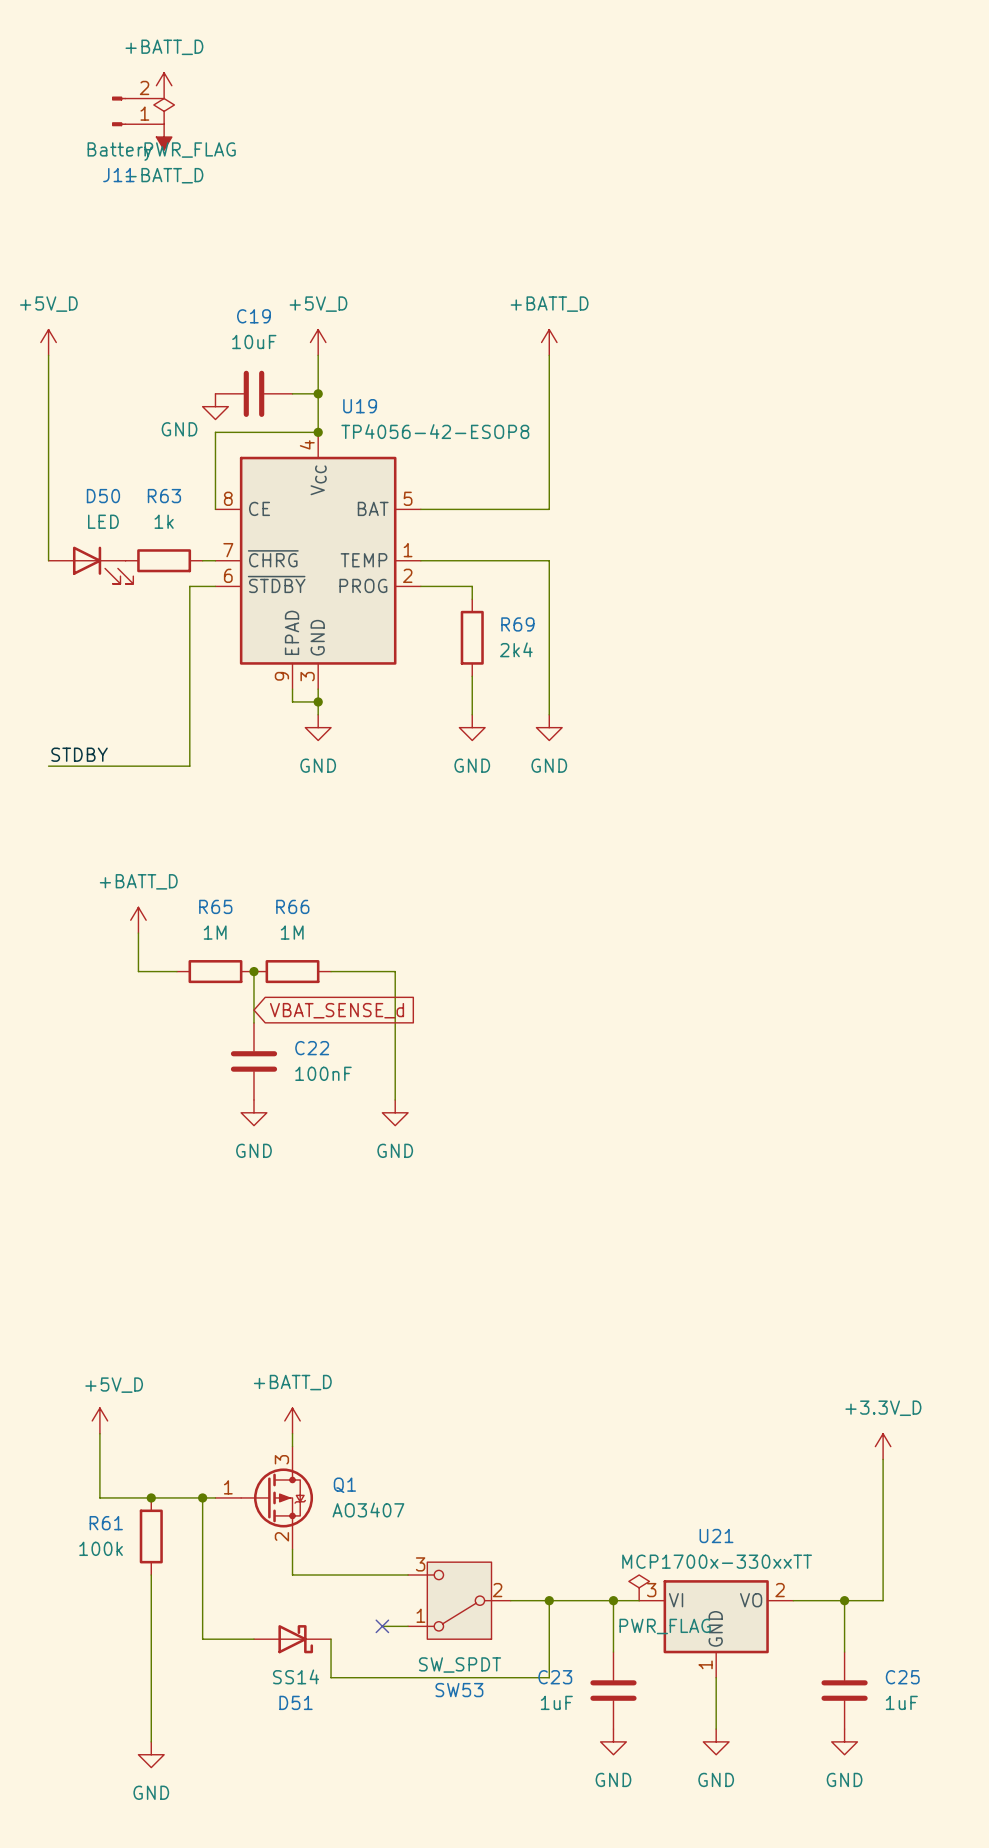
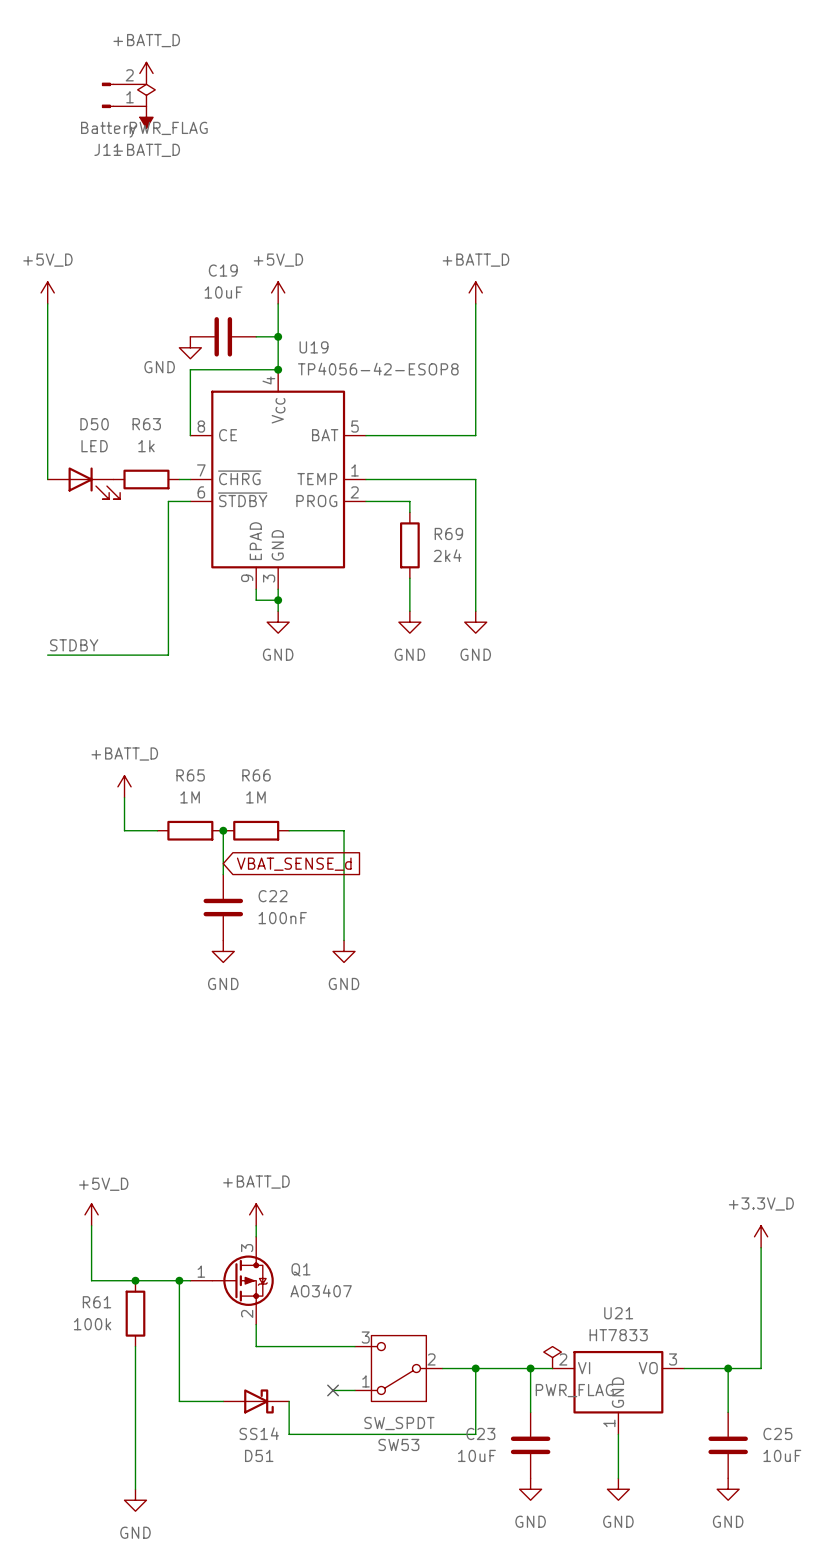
U21 value: MCP1700x-330xxTT (717, 1561) -> HT7833 (618, 1335)
U21 pin number: 3 (651, 1590) -> 2 (563, 1359)
U21 pin number: 2 (780, 1590) -> 3 (673, 1359)
C23 value: 1uF (556, 1702) -> 10uF (476, 1455)
C25 value: 1uF (901, 1702) -> 10uF (782, 1455)

